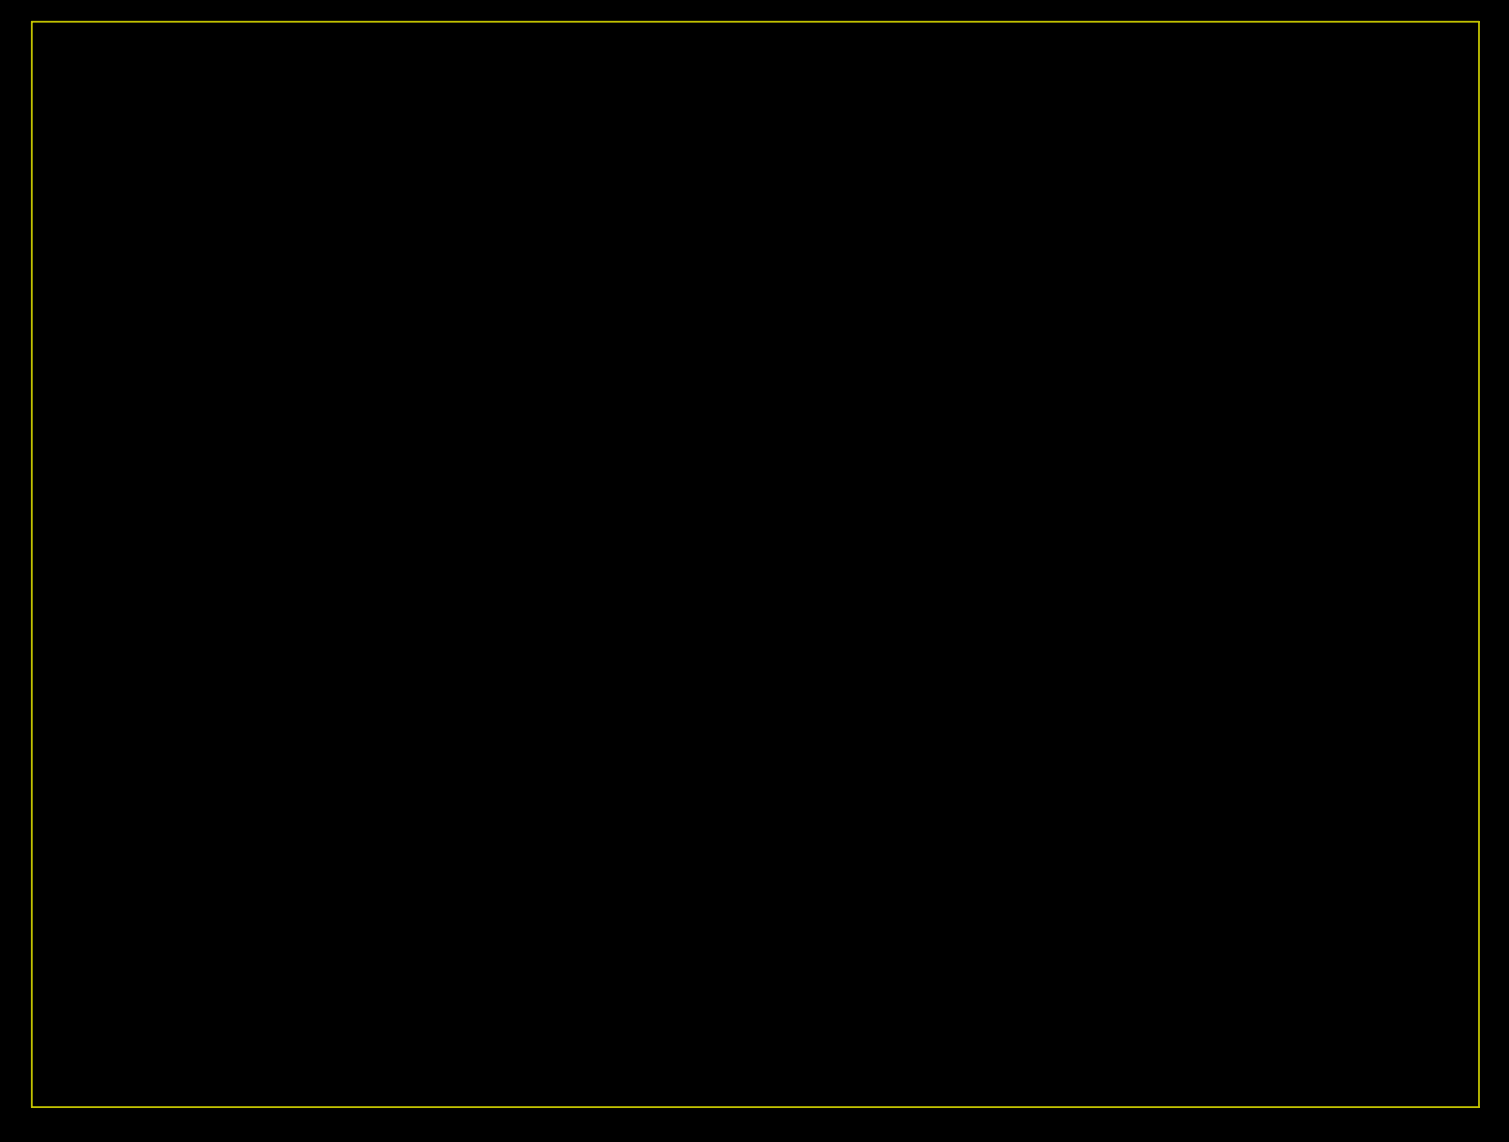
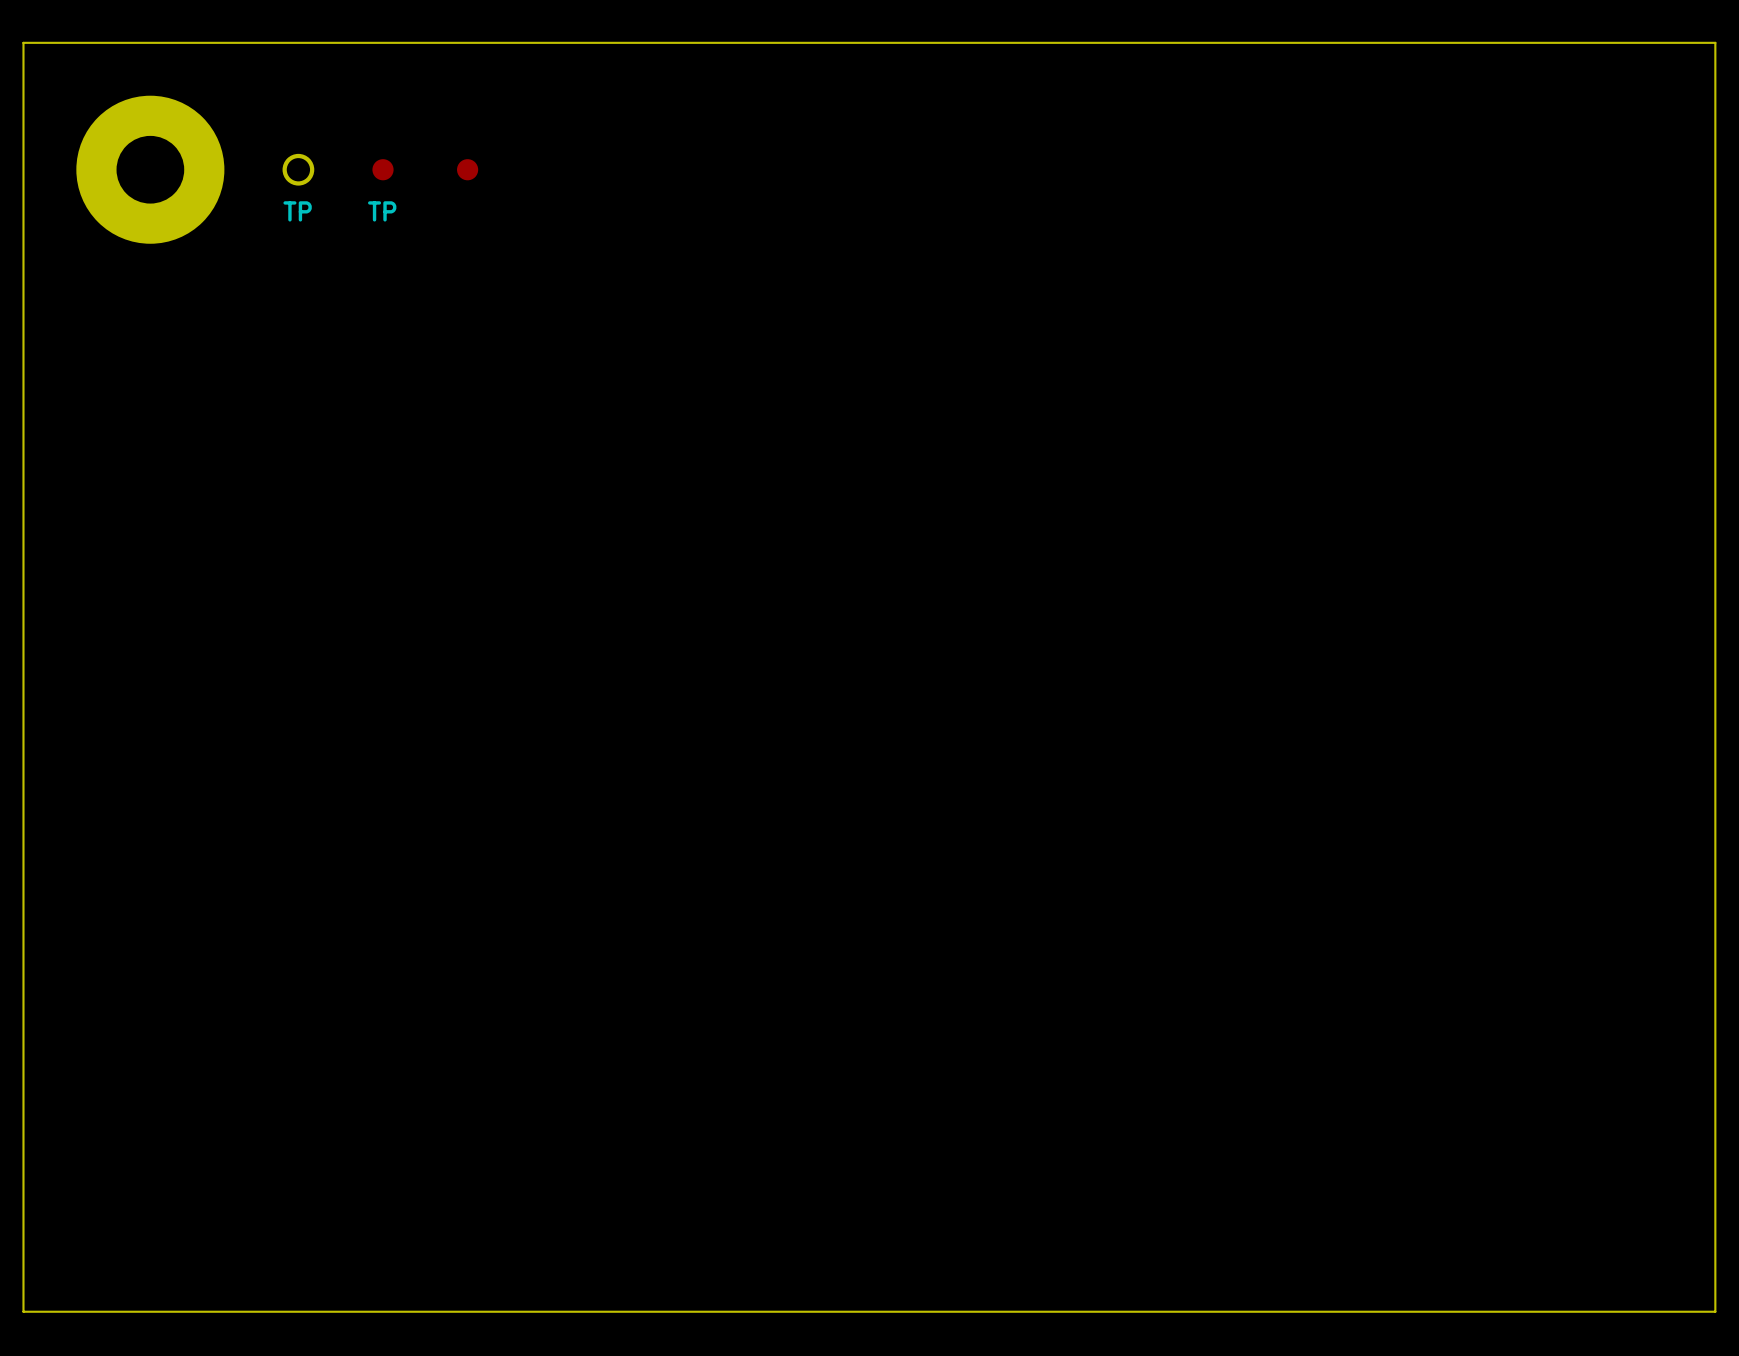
part: none -> (150, 169)
part: none -> TP (298, 169)
part: none -> TP (383, 169)
part: none -> (467, 169)

